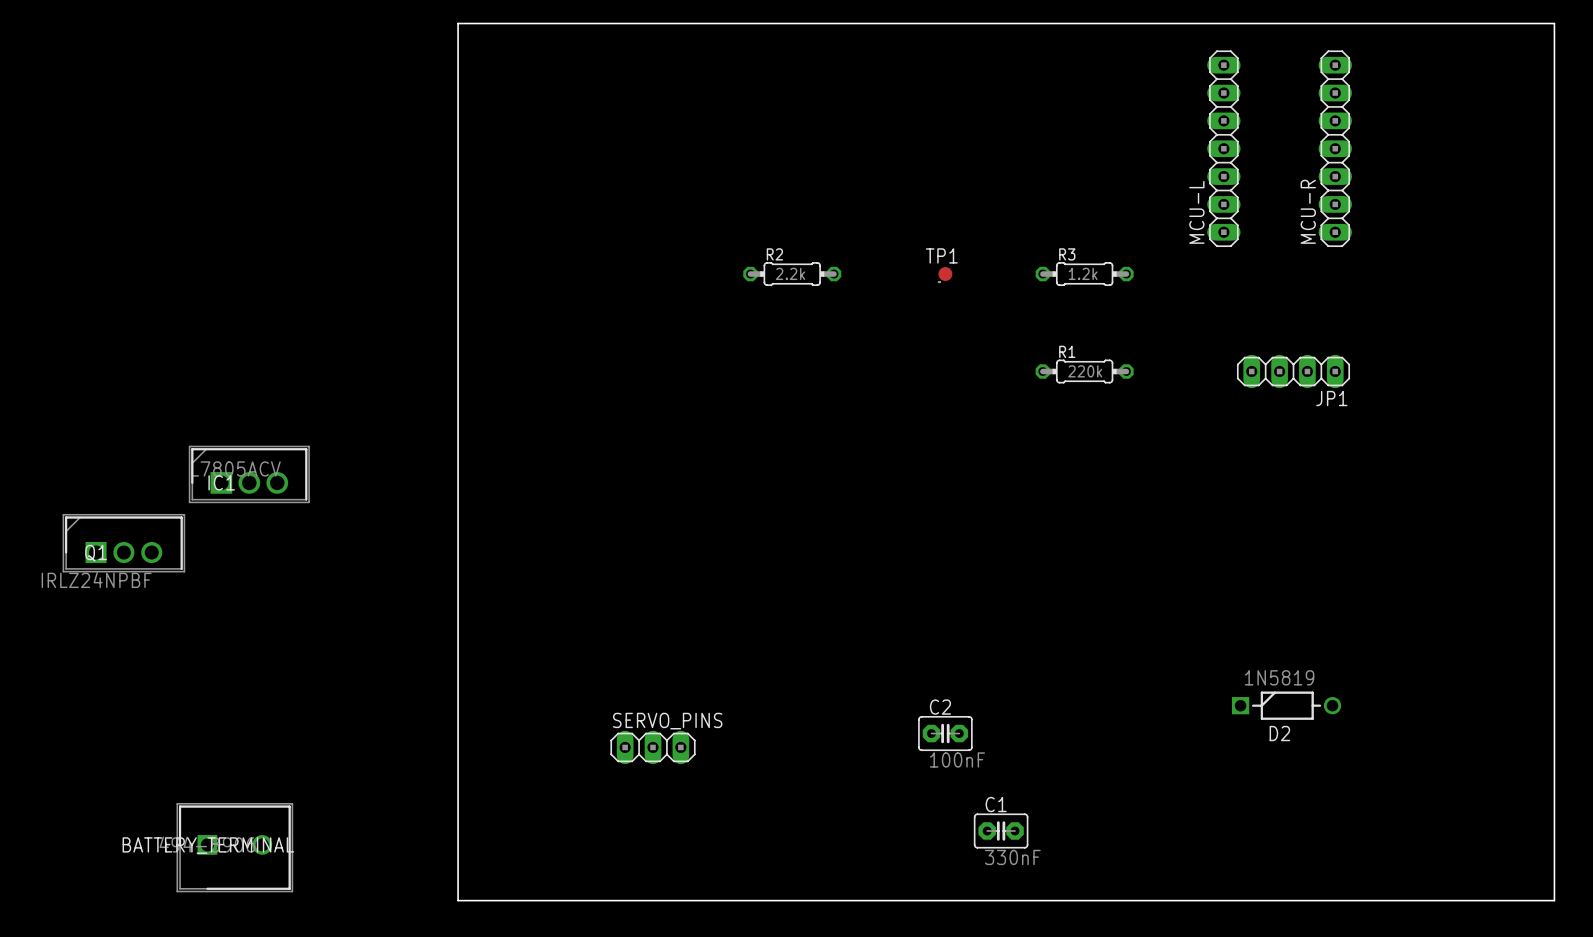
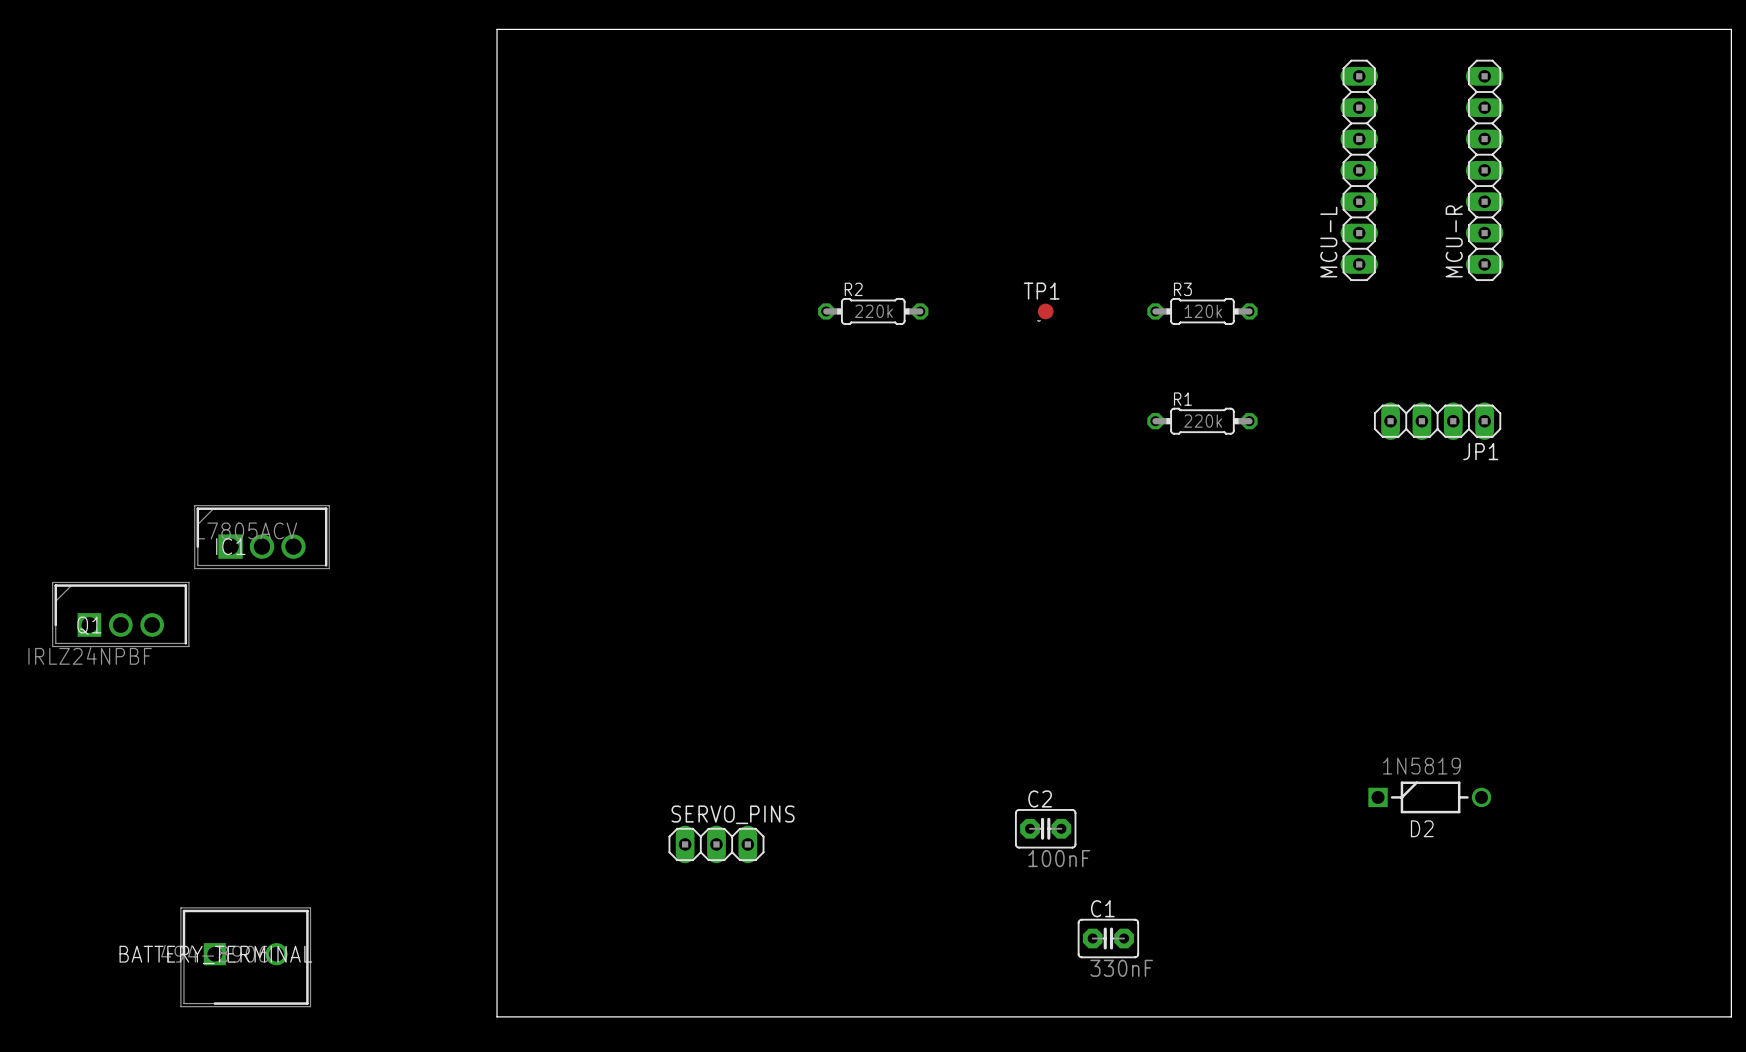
R2 value: 2.2k (790, 273) -> 220k (873, 311)
R3 value: 1.2k (1083, 273) -> 120k (1203, 311)

